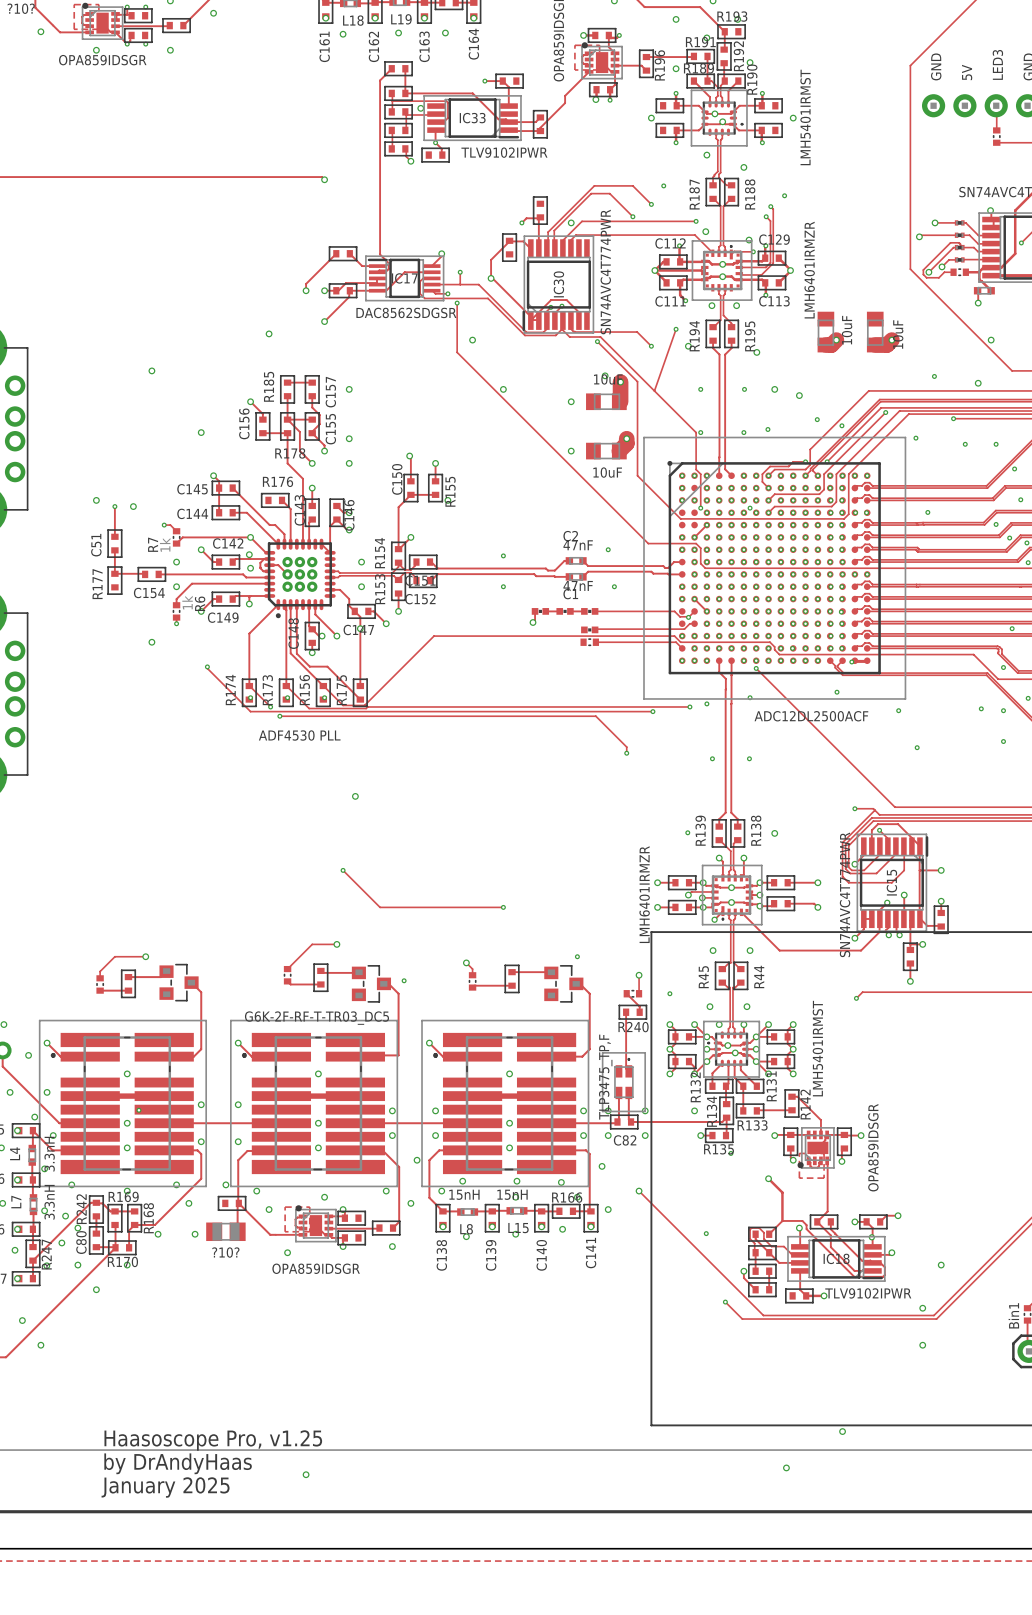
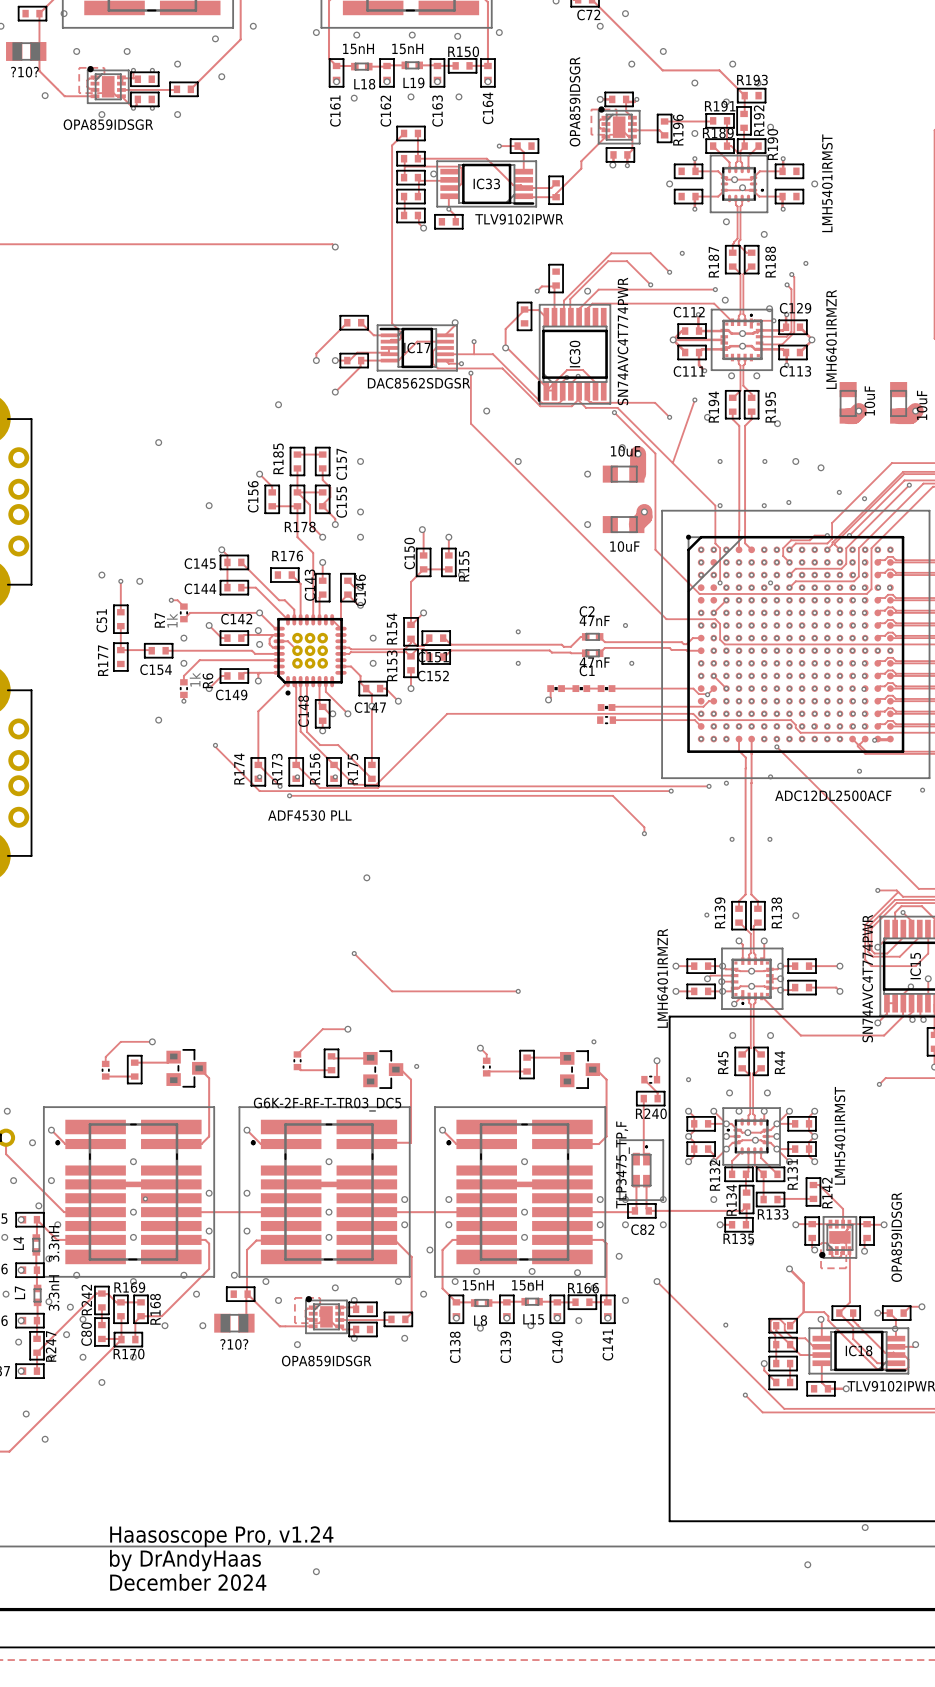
text: Haasoscope Pro, v1.25 (213, 1440) -> Haasoscope Pro, v1.24 (221, 1536)
text: January 2025 (165, 1487) -> December 2024 (188, 1582)

